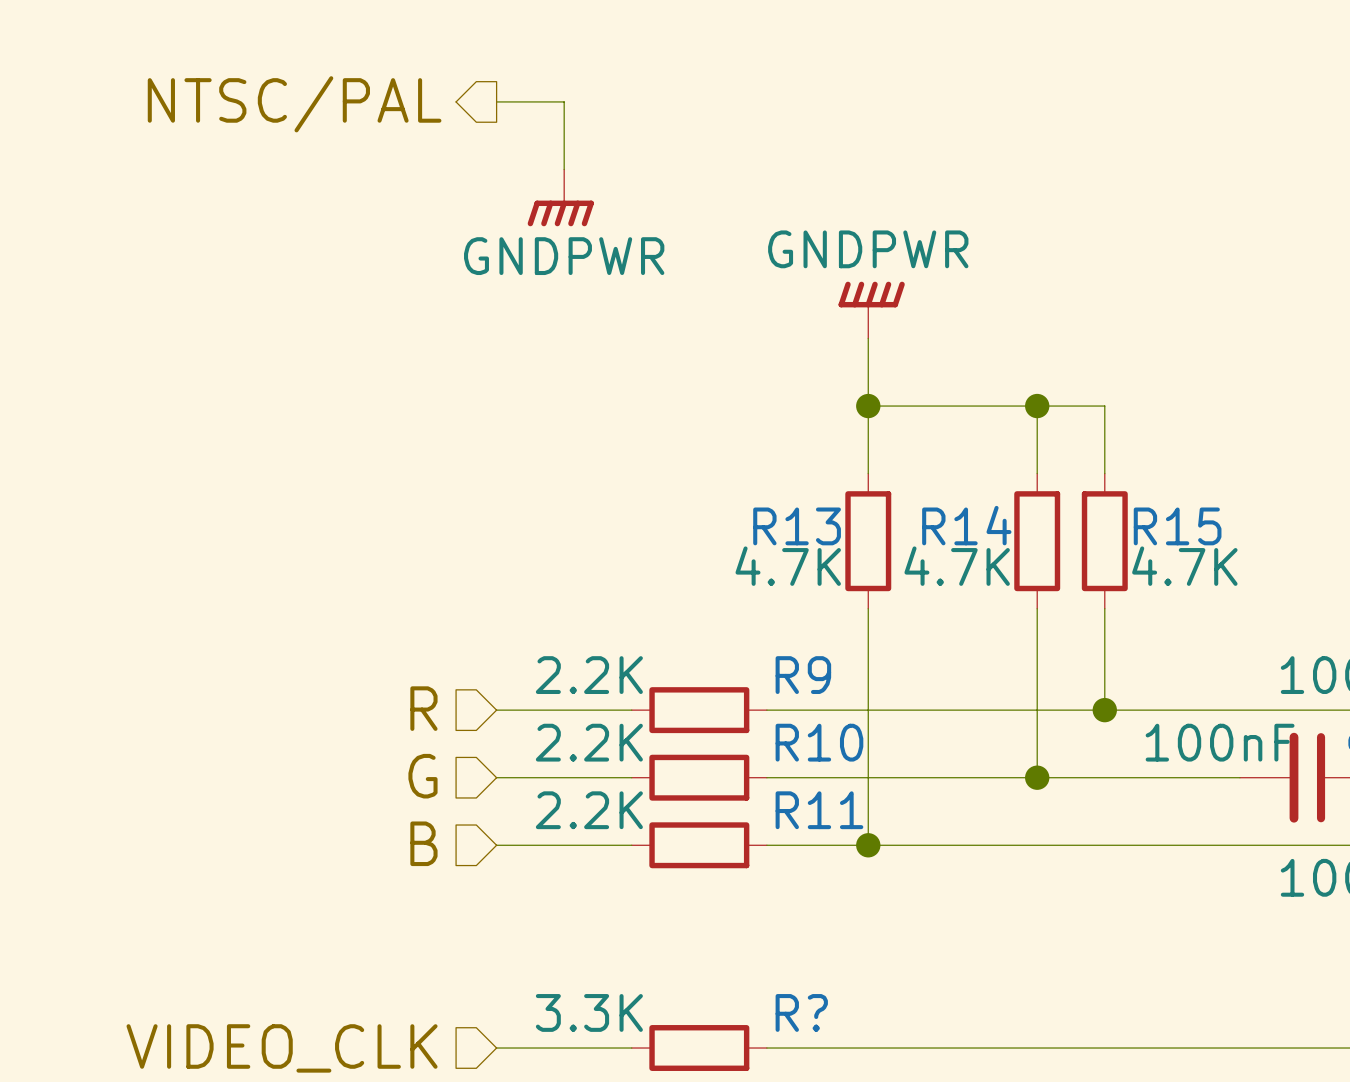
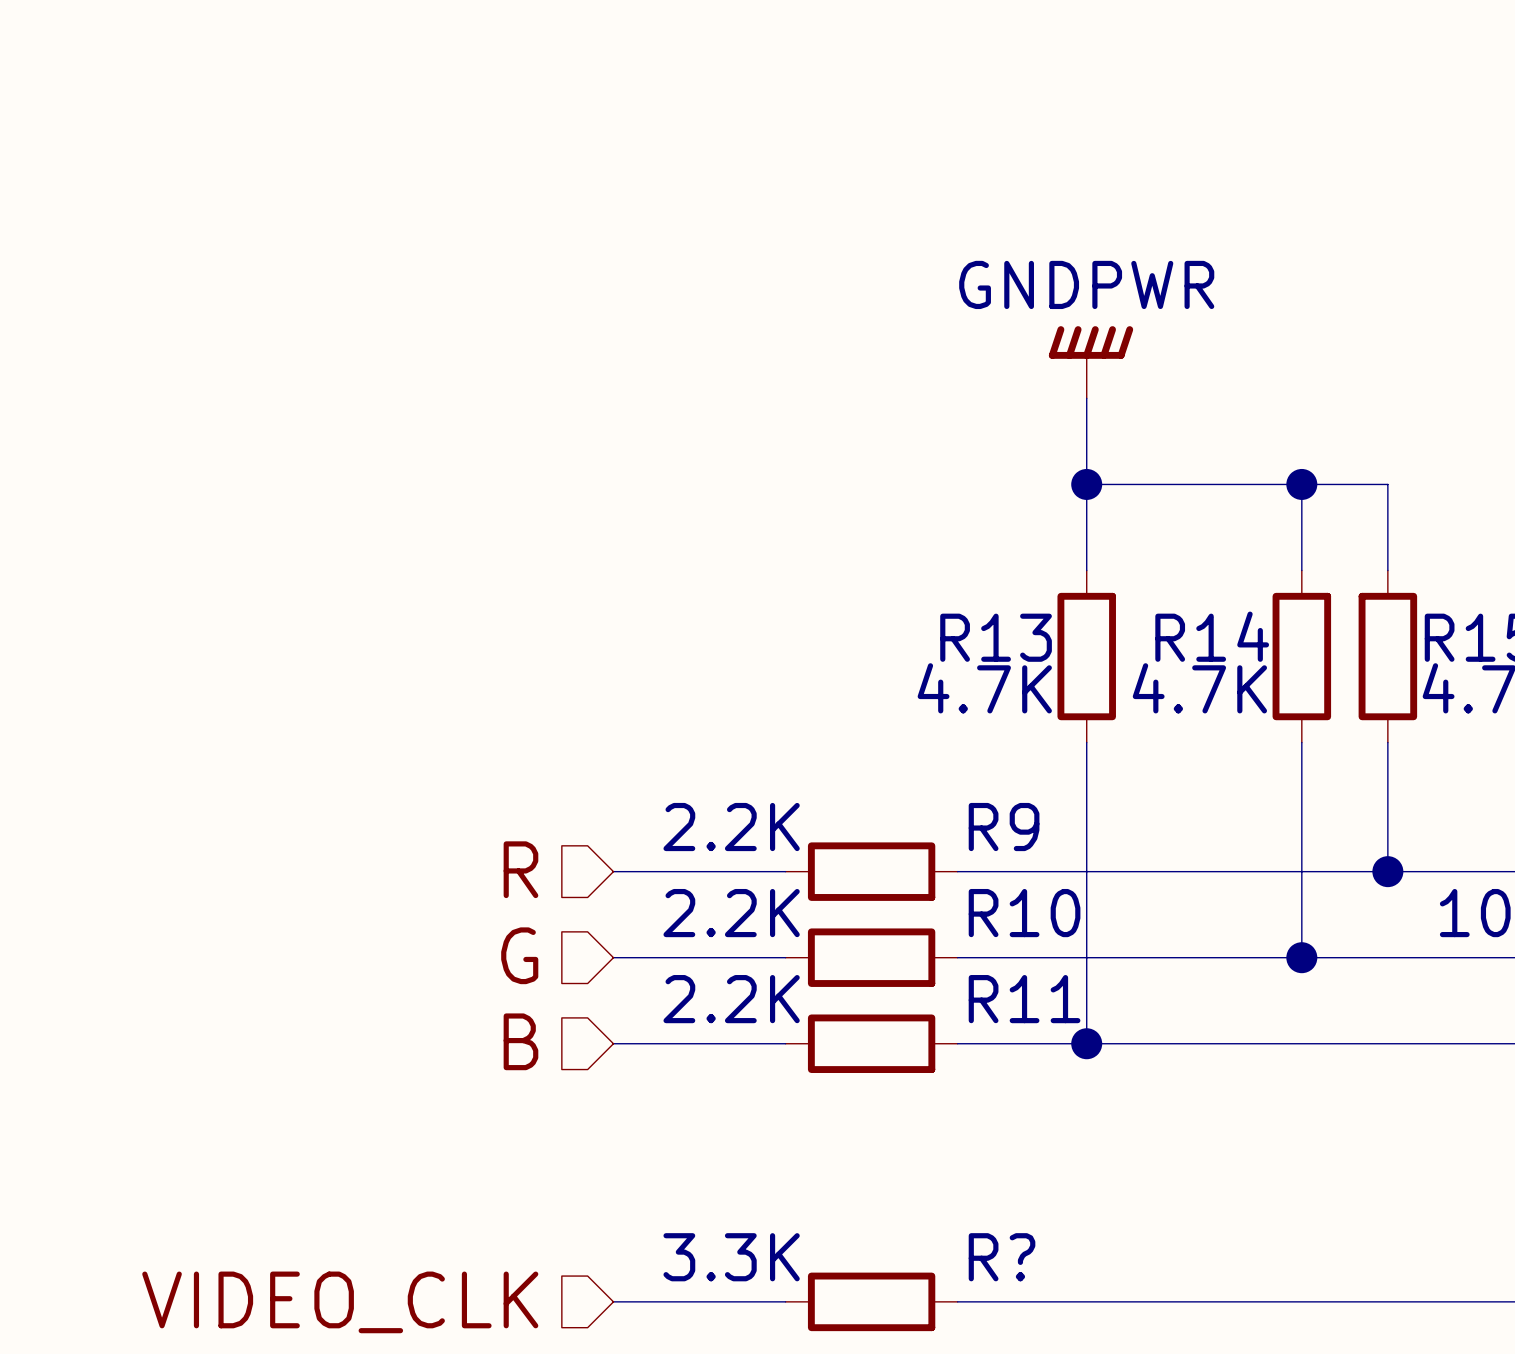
wire: (496, 101) (564, 101) (564, 169) -> none
hierarchical label: NTSC/PAL (294, 104) -> none
power symbol: GNDPWR (560, 197) -> none

